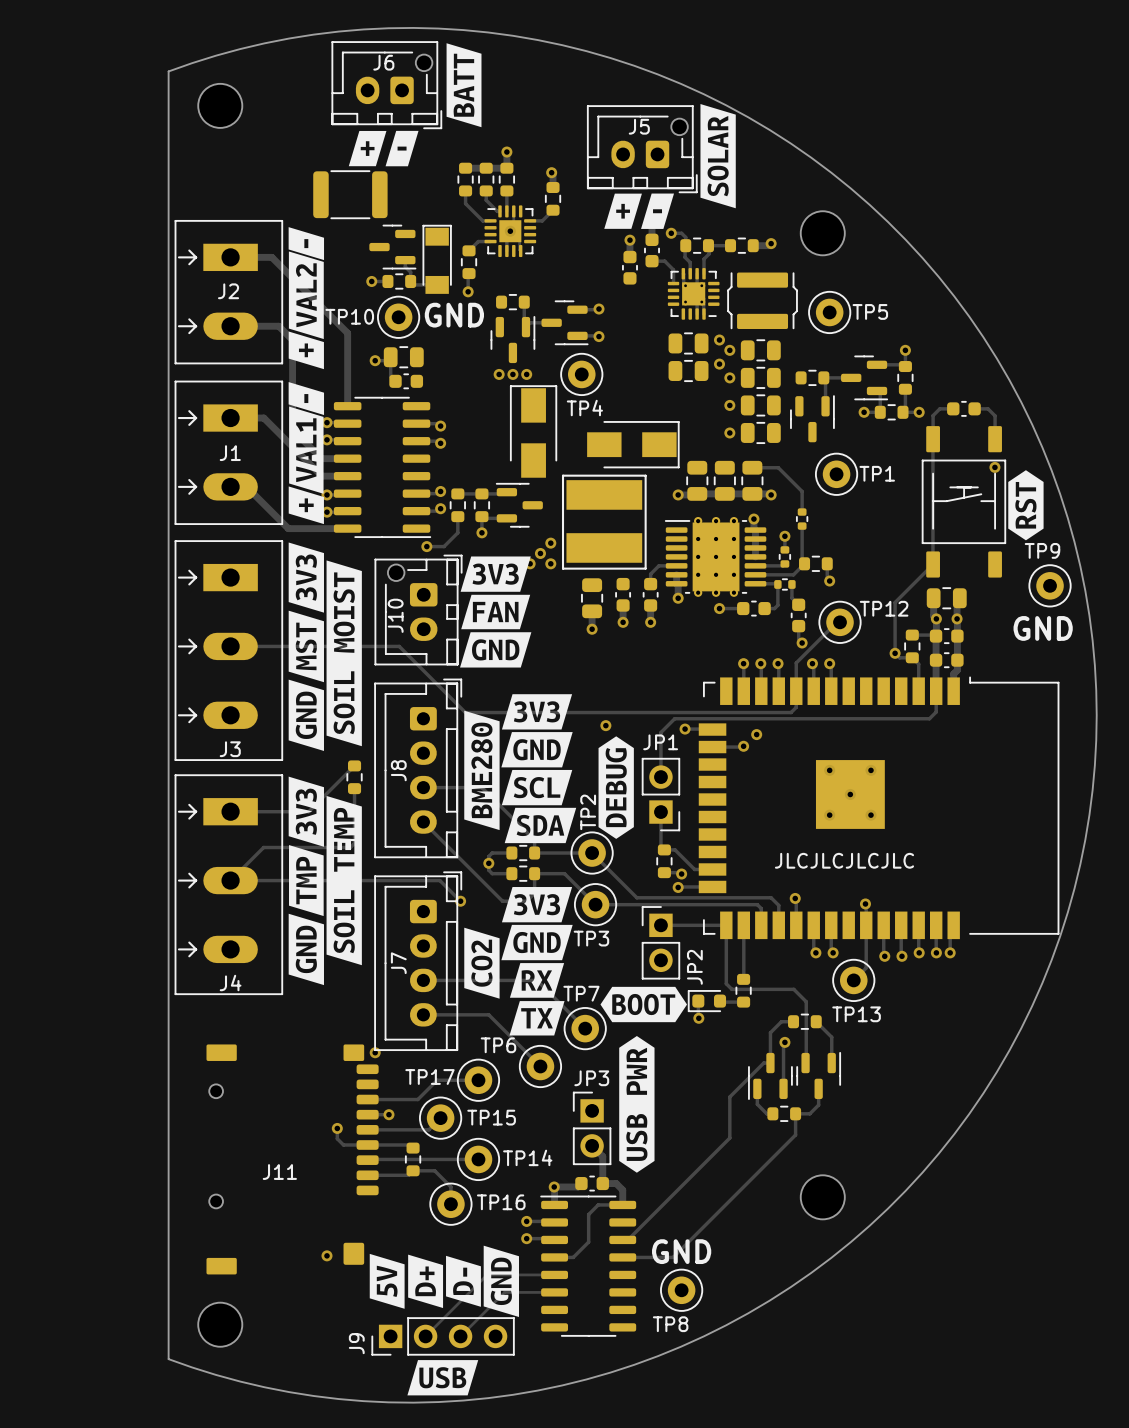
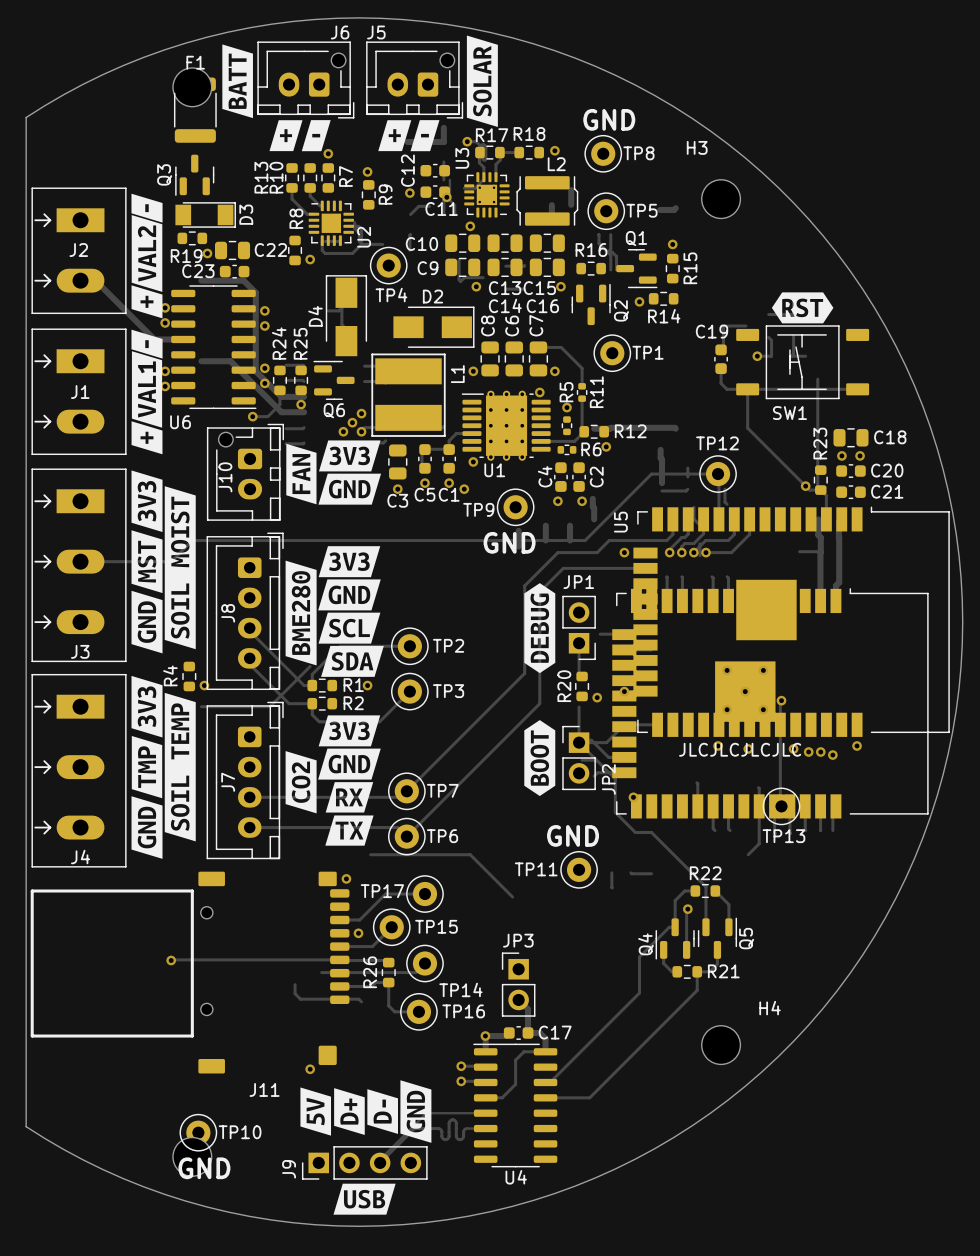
J6 name position: J6 (383, 62) -> J6 (340, 32)
board edge: (168, 71) (168, 1359) (216, 1374) (289, 1392) (338, 1399) (413, 1402) (463, 1400) (537, 1390) (610, 1372) (657, 1356) (726, 1325) (769, 1300) (831, 1257) (887, 1208) (922, 1172) (969, 1113) (996, 1072) (1032, 1006) (1060, 936) (1074, 888) (1089, 815) (1096, 740) (1096, 690) (1089, 615) (1074, 542) (1051, 470) (1021, 402) (996, 358) (954, 296) (922, 258) (869, 204) (811, 157) (769, 129) (703, 94) (634, 65) (586, 51) (513, 35) (438, 28) (363, 29) (313, 34) (240, 49) (192, 63) (168, 71) -> (26, 117) (26, 1126) (63, 1149) (103, 1169) (143, 1186) (185, 1200) (228, 1212) (271, 1219) (315, 1224) (359, 1226) (403, 1224) (447, 1219) (490, 1211) (533, 1200) (574, 1186) (615, 1168) (654, 1148) (692, 1125) (745, 1086) (793, 1041) (836, 991) (862, 955) (885, 917) (914, 858) (937, 796) (948, 753) (959, 688) (962, 644) (961, 578) (952, 512) (937, 448) (922, 406) (895, 346) (862, 289) (823, 235) (778, 187) (745, 158) (692, 118) (635, 85) (574, 58) (512, 37) (469, 28) (425, 21) (359, 17) (293, 21) (228, 32) (164, 49) (123, 65) (63, 94) (26, 117)
J6 position: (386, 85) -> (305, 80)
drawing position: (464, 85) -> (237, 81)
J5 name position: J5 (639, 126) -> J5 (376, 32)
drawing: [348, 130, 419, 167] -> none
F1: none -> (195, 110)
text: none -> GND (609, 119)
drawing: none -> [269, 120, 331, 152]
drawing: none -> [378, 120, 440, 152]
J5 position: (642, 149) -> (414, 80)
via: (506, 152) -> none
drawing position: (718, 156) -> (482, 81)
via: none -> (467, 141)
via: (551, 172) -> none
H3 name: none -> H3 (697, 147)
via: none -> (554, 150)
part: (465, 179) -> none
part: (486, 179) -> none
part: (506, 179) -> none
R17: none -> (489, 152)
R18: none -> (529, 152)
via: none -> (328, 153)
track: (465, 190) (465, 203) (482, 220) (490, 220) -> (292, 187) (292, 199) (307, 214) (313, 214)
track: (486, 190) (486, 200) (497, 211) (500, 211) -> (310, 187) (310, 196) (322, 205)
drawing: [604, 193, 675, 229] -> none
part: (350, 194) -> none
part: (553, 198) -> none
C12: none -> (435, 170)
via: none -> (367, 171)
Q3: none -> (194, 175)
R13: none -> (292, 177)
R10: none -> (310, 177)
R7: none -> (328, 177)
C11: none -> (435, 192)
via: none -> (409, 193)
drawing: none -> [131, 193, 163, 223]
drawing: [288, 227, 325, 261] -> none
R9: none -> (368, 194)
U3: none -> (486, 194)
part: (510, 231) -> none
track: (671, 233) (681, 233) (685, 237) (685, 257) (690, 262) (690, 273) -> (467, 141) (476, 141) (479, 145) (479, 162) (483, 167) (483, 177)
via: (671, 233) -> none
L2: none -> (547, 200)
via: (629, 240) -> none
via: (771, 243) -> none
part: (697, 245) -> none
track: (730, 245) (708, 245) (709, 253) (704, 259) (704, 273) -> (519, 152) (499, 152) (500, 159) (495, 164) (495, 177)
part: (741, 245) -> none
part: (392, 247) -> none
part: (652, 250) -> none
D3: none -> (205, 214)
track: (230, 257) (271, 257) (347, 333) (347, 406) -> none
part: (437, 259) -> none
U2: none -> (331, 223)
track: (652, 261) (664, 261) (673, 269) (673, 283) -> none
part: (469, 262) -> none
track: none -> (348, 226) (358, 226) (361, 229) (361, 244) (352, 253) (325, 253) (322, 250) (322, 240)
via: none -> (470, 226)
part: (629, 267) -> none
R19: none -> (192, 238)
via position: (371, 281) -> (310, 259)
part: (399, 281) -> none
C10: none -> (462, 243)
C13: none -> (505, 243)
C15: none -> (547, 243)
via: none -> (672, 244)
C22: none -> (232, 250)
R8: none -> (295, 250)
via: (468, 291) -> none
J2 position: (228, 292) -> (79, 250)
part: (693, 293) -> none
via: none -> (207, 253)
drawing position: (306, 295) -> (147, 253)
part: (762, 300) -> none
part: (512, 302) -> none
via: (598, 309) -> none
C9: none -> (462, 267)
C14: none -> (505, 267)
C16: none -> (547, 267)
R16: none -> (591, 268)
Q1: none -> (636, 268)
R15: none -> (672, 268)
TP5 position: (829, 312) -> (606, 211)
C23: none -> (234, 271)
text: GND (454, 315) -> none
TP10 name position: TP10 (349, 316) -> TP10 (240, 1132)
TP10 position: (398, 317) -> (198, 1132)
part: (564, 322) -> none
track: none -> (80, 280) (95, 280) (154, 339) (183, 339)
drawing: none -> [131, 285, 163, 359]
drawing: [288, 331, 325, 416] -> none
via: none -> (476, 286)
via: none -> (560, 286)
via: (598, 336) -> none
part: (512, 339) -> none
drawing: none -> [771, 292, 834, 324]
via: (719, 340) -> none
part: (688, 343) -> none
R14: none -> (663, 298)
part: (760, 350) -> none
via: (905, 350) -> none
Q2: none -> (591, 304)
via: none -> (165, 307)
part: (403, 357) -> none
via: none -> (264, 310)
via: (375, 360) -> none
via: (719, 364) -> none
D4: none -> (346, 315)
part: (688, 371) -> none
via: none -> (165, 322)
via: (499, 374) -> none
via: (512, 374) -> none
via: (526, 374) -> none
TP4 position: (581, 374) -> (388, 265)
via: none -> (264, 326)
via: (729, 377) -> none
part: (760, 377) -> none
part: (812, 377) -> none
part: (864, 377) -> none
part: (905, 377) -> none
D2: none -> (433, 327)
part: (406, 381) -> none
U6: none -> (213, 347)
via: (729, 405) -> none
part: (760, 405) -> none
track: (953, 408) (939, 408) (933, 415) (933, 439) -> none
part: (963, 408) -> none
track: (974, 408) (988, 408) (995, 415) (995, 439) -> none
part: (891, 412) -> none
via: (919, 412) -> none
C8: none -> (490, 358)
C6: none -> (514, 358)
C7: none -> (538, 358)
C19: none -> (721, 359)
part: (812, 418) -> none
SW1: none -> (802, 362)
via: (326, 422) -> none
via: none -> (264, 368)
via: (440, 426) -> none
track: none -> (721, 368) (721, 383) (726, 389) (857, 389)
via: none -> (165, 371)
via: none -> (473, 371)
via: none -> (554, 371)
part: (533, 431) -> none
via: (729, 432) -> none
part: (760, 432) -> none
R24: none -> (279, 380)
via: (326, 439) -> none
R25: none -> (301, 380)
Q6: none -> (333, 380)
via: none -> (264, 383)
via: (440, 443) -> none
part: (633, 444) -> none
via: none -> (165, 386)
drawing position: (306, 450) -> (147, 389)
track: none -> (747, 389) (747, 428) (809, 490) (820, 490) (826, 495) (826, 519)
J1 position: (228, 452) -> (79, 391)
via: none -> (539, 392)
R11: none -> (582, 392)
L1: none -> (408, 395)
via: none -> (301, 404)
part: (382, 467) -> none
track: (752, 467) (778, 467) (802, 491) (802, 512) -> (538, 347) (561, 347) (582, 368) (582, 386)
via: (994, 467) -> none
via: none -> (566, 407)
drawing: [1008, 470, 1044, 541] -> none
TP1 position: (836, 474) -> (612, 353)
via: none -> (361, 413)
part: (697, 480) -> none
part: (724, 480) -> none
part: (752, 480) -> none
via: none -> (252, 416)
drawing: none -> [131, 421, 163, 455]
track: (230, 486) (246, 486) (288, 528) (347, 528) -> none
drawing: [288, 486, 324, 525] -> none
via: none -> (352, 422)
via: (440, 491) -> none
U1: none -> (506, 425)
R5: none -> (566, 425)
via: (326, 494) -> none
via: (678, 494) -> none
via: (771, 494) -> none
via: none -> (343, 431)
via: none -> (361, 431)
R12: none -> (594, 431)
part: (963, 501) -> none
part: (457, 505) -> none
part: (481, 505) -> none
part: (519, 505) -> none
C18: none -> (850, 437)
drawing: none -> [286, 440, 382, 505]
via: (440, 508) -> none
via: (326, 512) -> none
via: none -> (606, 446)
track: (457, 516) (457, 532) (444, 546) (426, 546) -> (279, 390) (279, 404) (267, 416) (252, 416)
R6: none -> (566, 449)
via: (753, 519) -> none
part: (802, 519) -> none
part: (604, 522) -> none
via: none -> (841, 455)
via: none -> (860, 455)
track: (802, 526) (802, 561) (804, 563) (793, 574) (755, 574) -> (582, 398) (582, 429) (584, 431) (574, 441) (541, 441)
C5: none -> (424, 458)
C1: none -> (449, 458)
C3: none -> (397, 461)
via: (481, 532) -> none
via: none -> (473, 461)
via: (784, 536) -> none
drawing: none -> [131, 470, 163, 533]
drawing: [288, 542, 324, 613] -> none
via: (550, 543) -> none
C20: none -> (850, 471)
via: (426, 546) -> none
C4: none -> (560, 477)
C2: none -> (579, 477)
TP9 name position: TP9 (1042, 550) -> TP9 (478, 509)
via: (540, 553) -> none
R23: none -> (820, 480)
drawing: [460, 556, 532, 668] -> none
via: none -> (424, 483)
via: none -> (449, 483)
part: (715, 556) -> none
part: (784, 556) -> none
via: none -> (805, 486)
via: none -> (397, 489)
via: (550, 563) -> none
part: (815, 563) -> none
track: (933, 564) (895, 602) (895, 653) (899, 657) (912, 657) (918, 664) (918, 691) -> none
track: (676, 565) (658, 565) (650, 574) (650, 584) -> (471, 433) (456, 433) (449, 440) (449, 449)
C21: none -> (850, 492)
via: none -> (557, 501)
via: none -> (582, 501)
via: (829, 581) -> none
track: (755, 583) (777, 584) (777, 605) (774, 608) (764, 608) -> none
part: (784, 584) -> none
TP9 position: (1050, 585) -> (515, 507)
part: (623, 594) -> none
part: (650, 594) -> none
part: (592, 598) -> none
via: (678, 598) -> none
track: none -> (672, 519) (672, 534) (666, 540) (609, 540) (597, 552) (557, 552) (524, 585) (524, 673) (400, 797) (249, 797)
track: none -> (688, 519) (688, 534) (681, 537) (669, 549) (669, 552)
track: none -> (703, 519) (703, 533) (693, 543) (684, 543) (681, 546) (681, 552)
track: none -> (718, 519) (718, 474) (651, 474) (585, 540) (192, 540) (171, 561) (80, 561)
track: none -> (734, 519) (734, 534) (728, 540) (705, 540) (693, 552)
track: none -> (749, 519) (749, 534) (731, 552) (705, 552)
part: (946, 598) -> none
track: (719, 608) (743, 608) -> none
via: (719, 608) -> none
part: (753, 608) -> none
TP12 name position: TP12 (884, 608) -> TP12 (717, 443)
J10 position: (418, 610) -> (245, 472)
part: (798, 615) -> none
via: (936, 618) -> none
via: (957, 618) -> none
via: (623, 622) -> none
via: (650, 622) -> none
track: (840, 622) (836, 622) (796, 662) (796, 707) (791, 712) (465, 712) (399, 646) (230, 646) -> none
TP12 position: (840, 622) -> (718, 474)
text: none -> GND (509, 542)
drawing: none -> [318, 546, 381, 611]
text: GND (1043, 628) -> none
via: (592, 629) -> none
via: none -> (624, 552)
via: none -> (669, 552)
via: none -> (681, 552)
via: none -> (693, 552)
via: none -> (705, 552)
part: (946, 636) -> none
via: (802, 643) -> none
drawing position: (306, 646) -> (147, 561)
part: (912, 646) -> none
J3 position: (228, 650) -> (79, 565)
drawing position: (344, 653) -> (180, 567)
via: (895, 653) -> none
track: none -> (645, 568) (563, 568) (539, 591) (539, 703) (406, 836) (397, 827) (249, 827)
part: (946, 660) -> none
via: (743, 663) -> none
via: (760, 663) -> none
via: (778, 663) -> none
via: (812, 663) -> none
via: (829, 663) -> none
drawing: none -> [131, 590, 163, 654]
drawing: [288, 679, 324, 751] -> none
track: (936, 691) (936, 712) (929, 718) (674, 718) (660, 732) (660, 739) -> none
drawing: [501, 694, 573, 768] -> none
U5: none -> (791, 621)
track: none -> (249, 628) (249, 631) (304, 685) (312, 685) (312, 674) (340, 646) (409, 646)
via: (605, 725) -> none
via: (685, 729) -> none
via: (756, 734) -> none
via: (743, 746) -> none
track: none -> (249, 658) (249, 664) (289, 703) (312, 703) (312, 714) (319, 721) (379, 721) (409, 691)
J8 position: (418, 768) -> (245, 611)
drawing position: (481, 770) -> (301, 613)
drawing: none -> [131, 675, 163, 738]
drawing: [288, 776, 324, 847] -> none
R4: none -> (189, 676)
part: (354, 777) -> none
via: none -> (204, 685)
R1: none -> (322, 685)
via: none -> (367, 685)
track: (423, 787) (481, 787) (534, 840) (534, 853) (592, 853) (636, 897) (771, 897) (778, 905) (778, 925) -> none
drawing position: (537, 787) -> (349, 628)
drawing position: (616, 787) -> (539, 628)
track: (354, 788) (354, 843) (350, 847) (263, 847) (230, 880) (439, 880) (460, 901) -> none
R20: none -> (582, 686)
JP1 position: (660, 794) -> (579, 627)
via: none -> (624, 691)
via: none -> (597, 697)
track: none -> (781, 700) (781, 806)
via: none -> (781, 700)
R2: none -> (322, 703)
TP2 name rotation: 0° (588, 812) -> 90° clockwise (448, 645)
TP2 name position: TP2 (588, 812) -> TP2 (448, 645)
drawing: none -> [318, 715, 381, 780]
track: (423, 822) (502, 901) (526, 901) (534, 893) (534, 873) (564, 873) (595, 904) (757, 904) (761, 908) (761, 925) -> none
drawing position: (540, 825) -> (352, 661)
drawing: none -> [524, 720, 556, 797]
track: (511, 853) (492, 853) (488, 856) (488, 870) (492, 873) (511, 873) -> none
part: (523, 853) -> none
TP2 position: (592, 853) -> (409, 646)
via: none -> (718, 745)
via: none -> (857, 745)
via: none -> (748, 748)
via: none -> (793, 748)
part: (664, 861) -> none
via: (488, 863) -> none
via: none -> (808, 752)
via: none -> (820, 752)
via: none -> (832, 755)
part: (523, 873) -> none
via: (681, 874) -> none
drawing position: (306, 880) -> (147, 767)
drawing position: (344, 880) -> (180, 767)
J4 position: (228, 884) -> (79, 770)
drawing: [501, 887, 573, 961] -> none
via: (678, 887) -> none
via: (795, 898) -> none
via: (460, 901) -> none
via: (865, 903) -> none
TP3 position: (595, 904) -> (409, 691)
drawing: none -> [131, 796, 163, 859]
drawing: [288, 913, 324, 986] -> none
via: none -> (633, 797)
track: (660, 925) (726, 925) (726, 983) (731, 989) (793, 989) (806, 1001) (805, 1063) -> (657, 724) (624, 724) (606, 742) (579, 742) (615, 778) (615, 812) (635, 832) (651, 832) (705, 886) (705, 927)
track: (743, 925) (743, 979) -> none
TP3 name position: TP3 (591, 938) -> TP3 (448, 691)
JP2 position: (660, 942) -> (579, 758)
via: (815, 952) -> none
via: (833, 952) -> none
via: (919, 952) -> none
via: (936, 952) -> none
via: (950, 952) -> none
via: (884, 956) -> none
via: (901, 956) -> none
text: none -> GND (573, 835)
J7 position: (418, 961) -> (245, 780)
drawing position: (481, 963) -> (301, 782)
drawing position: (537, 980) -> (349, 797)
TP13 position: (853, 980) -> (781, 806)
drawing: [600, 986, 688, 1173] -> none
part: (743, 990) -> none
TP7 name position: TP7 (581, 993) -> TP7 (442, 790)
TP11: none -> (579, 869)
part: (706, 1001) -> none
R22 name: none -> R22 (705, 873)
via: none -> (346, 878)
track: (423, 1014) (488, 1014) (540, 1066) -> none
drawing position: (537, 1018) -> (349, 830)
via: (698, 1018) -> none
line: none -> (32, 891) (192, 891) (192, 1036) (32, 1036) (32, 891)
track: none -> (424, 894) (385, 894) (359, 920) (339, 920)
TP7 position: (585, 1028) -> (406, 791)
TP6 name position: TP6 (498, 1045) -> TP6 (442, 836)
via: (375, 1052) -> none
track: none -> (391, 927) (372, 946) (339, 946)
TP6 position: (540, 1066) -> (406, 836)
via: none -> (358, 933)
Q5 name: none -> Q5 (746, 938)
track: (478, 1080) (437, 1080) (417, 1099) (367, 1099) -> none
TP17 position: (478, 1080) -> (424, 894)
Q4 name: none -> Q4 (645, 944)
track: none -> (171, 960) (339, 959) (386, 960) (388, 962)
via: none -> (171, 960)
track: none -> (424, 963) (415, 972) (339, 973)
TP14: none -> (424, 963)
R21 name: none -> R21 (723, 971)
via: (388, 1114) -> none
R26: none -> (388, 972)
track: (440, 1118) (428, 1129) (367, 1129) -> none
TP15 position: (440, 1118) -> (391, 927)
via: (337, 1128) -> none
H4 name: none -> H4 (769, 1008)
TP14 name: TP14 (527, 1157) -> TP16 (463, 1011)
J11 position: (292, 1159) -> (273, 972)
part: (413, 1159) -> none
track: (450, 1159) (367, 1160) -> (394, 1011) (388, 1005) (388, 982) (375, 982) (371, 986) (339, 986)
J11 name position: J11 (279, 1172) -> J11 (264, 1089)
track: (367, 1175) (408, 1175) (413, 1170) (434, 1170) (450, 1186) (450, 1204) -> none
C17 name: none -> C17 (555, 1032)
TP16: (450, 1204) -> none
text: GND (681, 1251) -> none
via position: (326, 1255) -> (310, 1069)
drawing position: (387, 1281) -> (315, 1111)
drawing position: (425, 1281) -> (349, 1111)
drawing position: (463, 1281) -> (382, 1111)
drawing position: (501, 1281) -> (415, 1111)
TP8 position: (681, 1290) -> (603, 153)
track: (533, 1292) (504, 1292) (460, 1336) -> (467, 1128) (464, 1130) (463, 1137) (459, 1139) (456, 1136) (456, 1123) (453, 1119) (449, 1122) (449, 1136) (446, 1139) (442, 1137) (439, 1128) (414, 1128) (380, 1162)
TP8 name position: TP8 (670, 1324) -> TP8 (638, 153)
J9 position: (443, 1336) -> (364, 1162)
text: none -> GND (204, 1168)
U4 name: none -> U4 (516, 1177)
drawing position: (442, 1377) -> (364, 1199)

